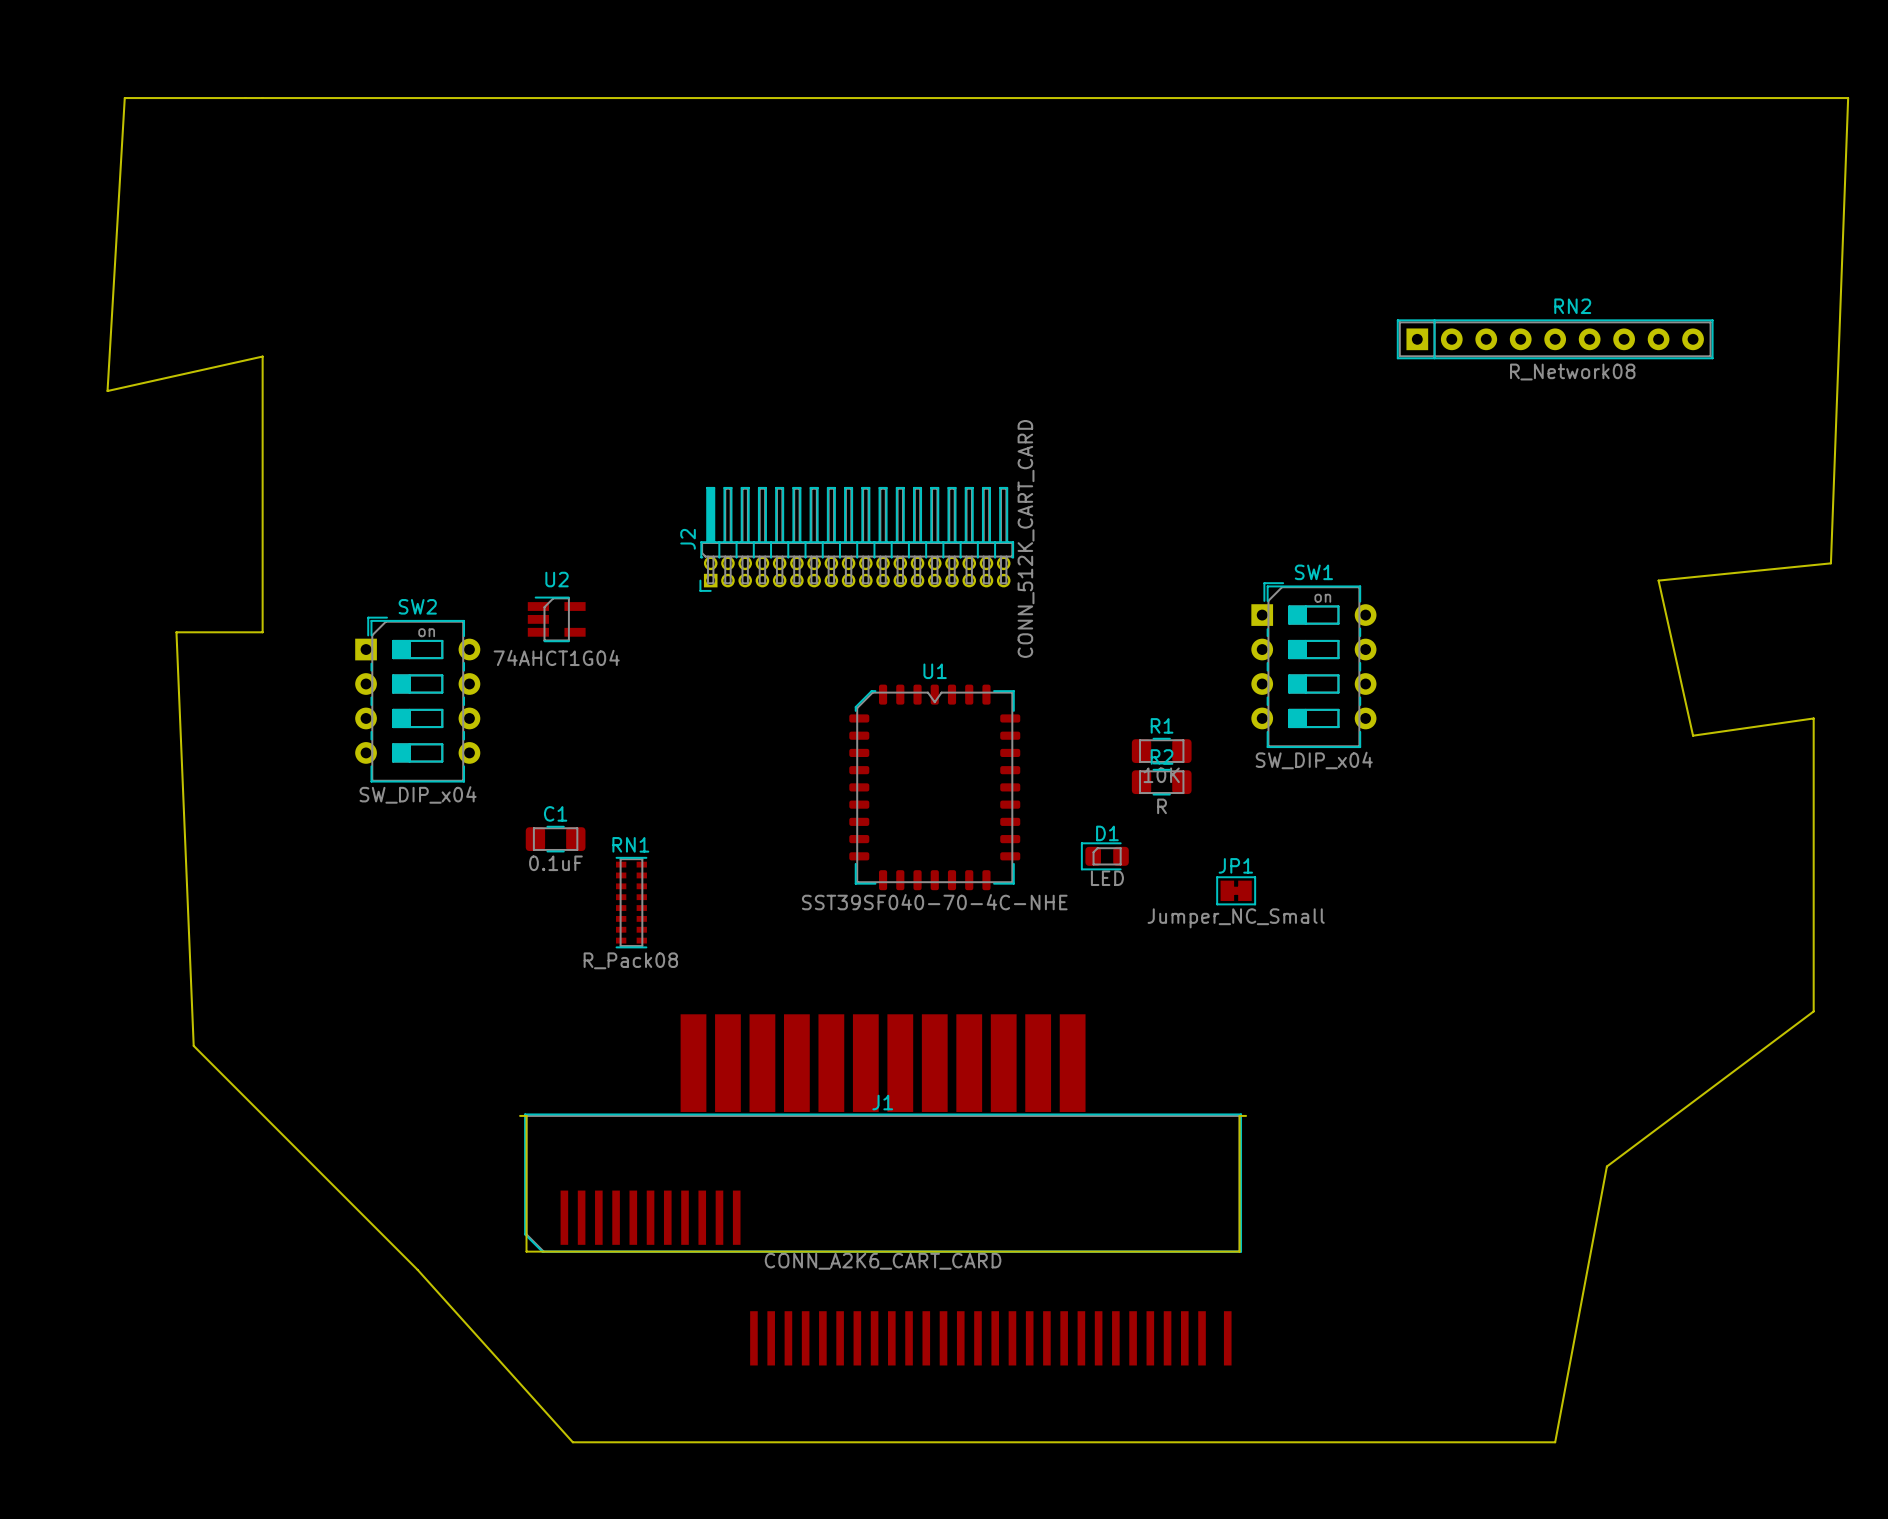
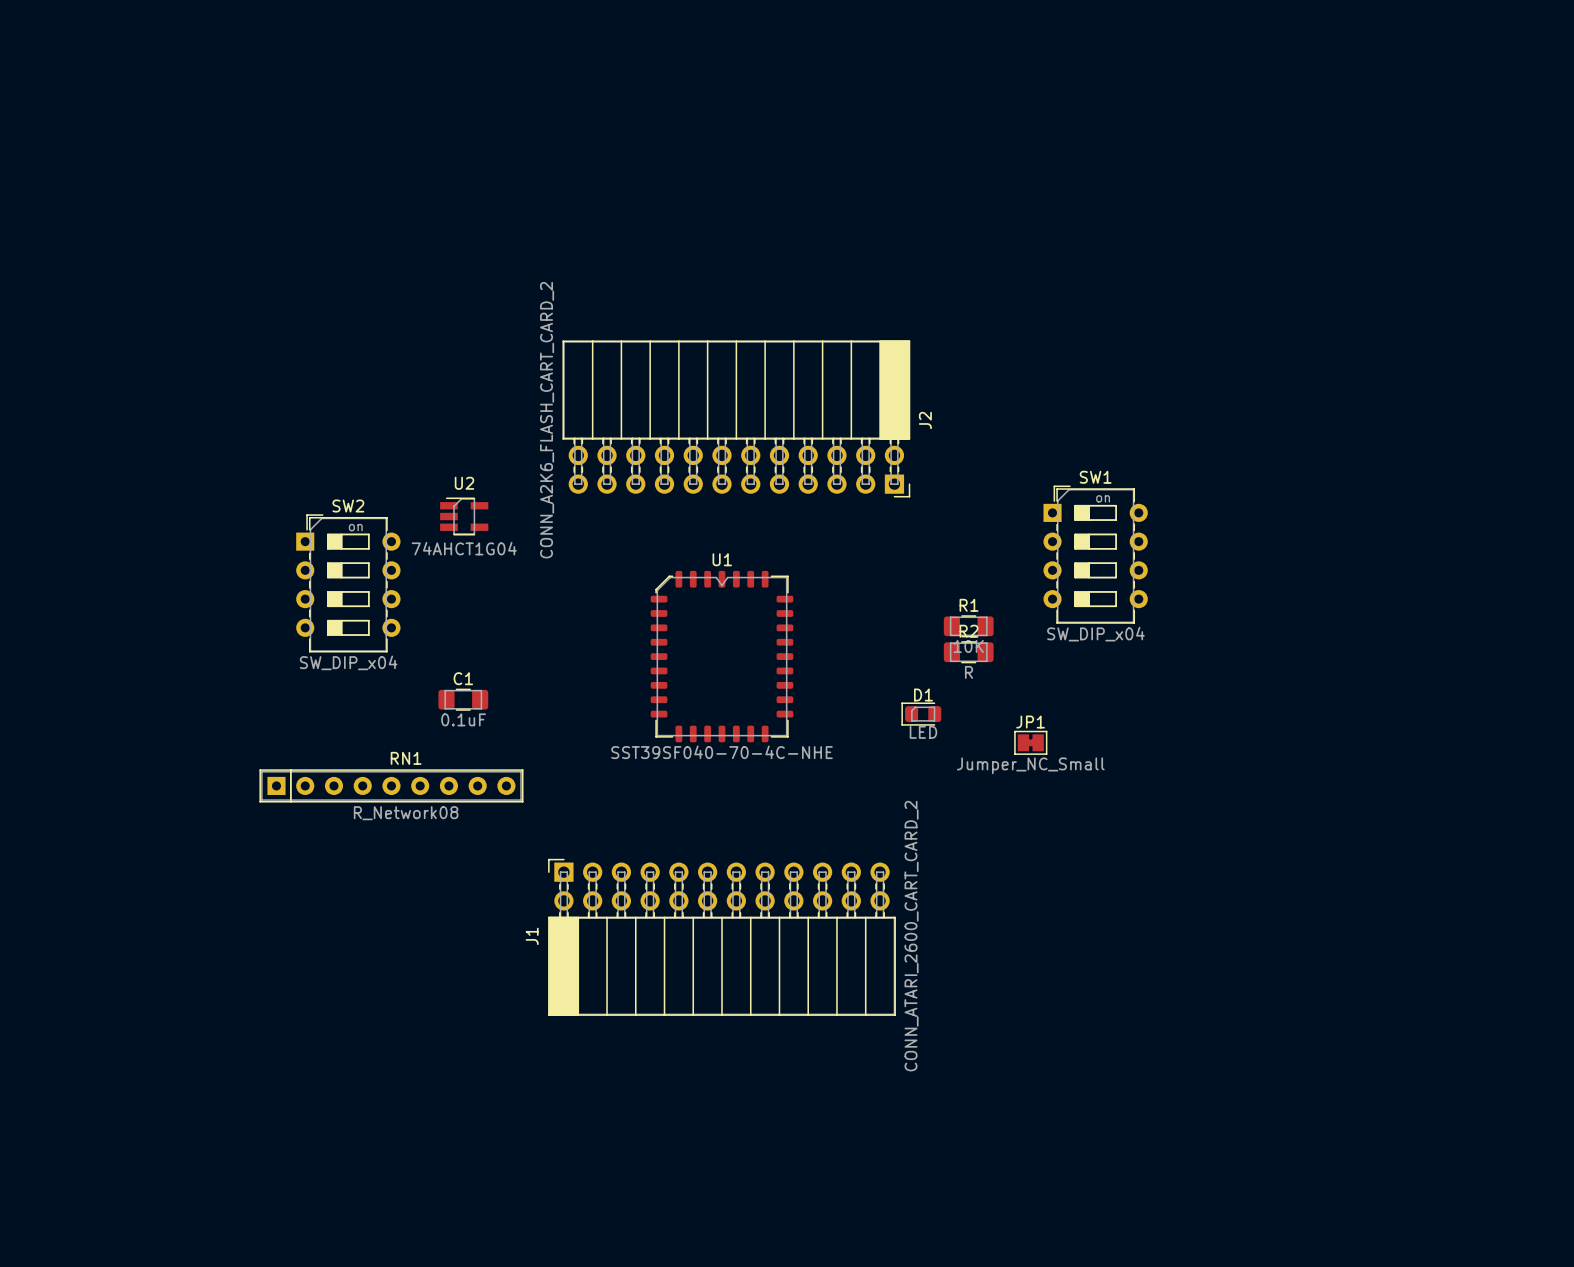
board edge: (124, 98) (1848, 98) (1830, 563) (1658, 580) (1693, 735) (1813, 718) (1813, 1011) (1606, 1166) (1555, 1442) (572, 1442) (417, 1269) (193, 1045) (176, 632) (262, 632) (262, 356) (107, 391) (124, 98) -> none
RN2: R_Network08 (1555, 339) -> none
J2 footprint: [699, 487, 1014, 592] -> [562, 340, 911, 498]
J2 value: CONN_512K_CART_CARD (1026, 538) -> CONN_A2K6_FLASH_CART_CARD_2 (547, 420)
J2 name position: J2 (688, 539) -> J2 (925, 420)
U1 position: (934, 787) -> (722, 656)
RN1 name position: RN1 (630, 844) -> RN1 (406, 758)
RN1 footprint: [615, 857, 648, 949] -> [259, 769, 524, 803]
RN1 value: R_Pack08 (630, 960) -> R_Network08 (406, 813)
J1 footprint: [519, 1014, 1247, 1366] -> [548, 858, 896, 1016]
J1 name position: J1 (882, 1102) -> J1 (532, 936)
J1 value: CONN_A2K6_CART_CARD (883, 1261) -> CONN_ATARI_2600_CART_CARD_2 (911, 936)

